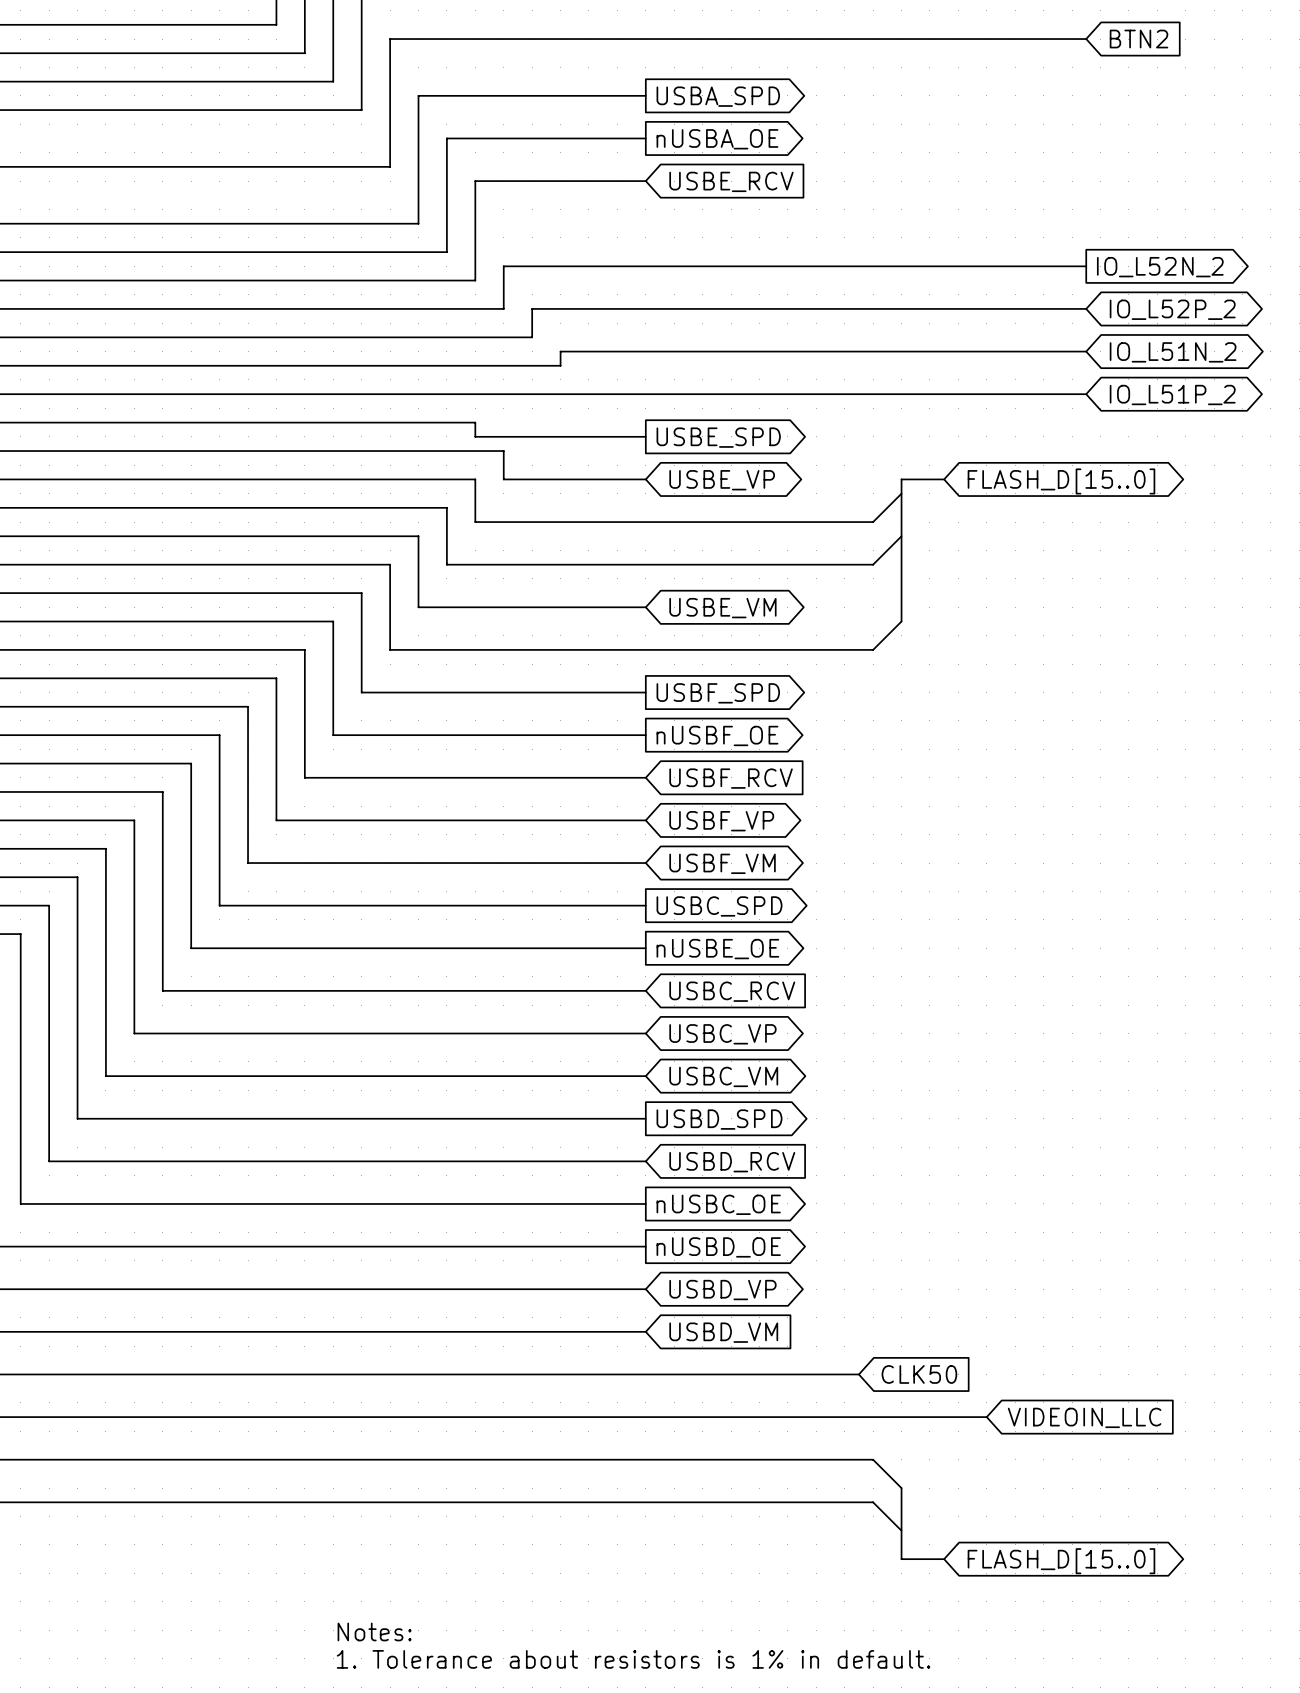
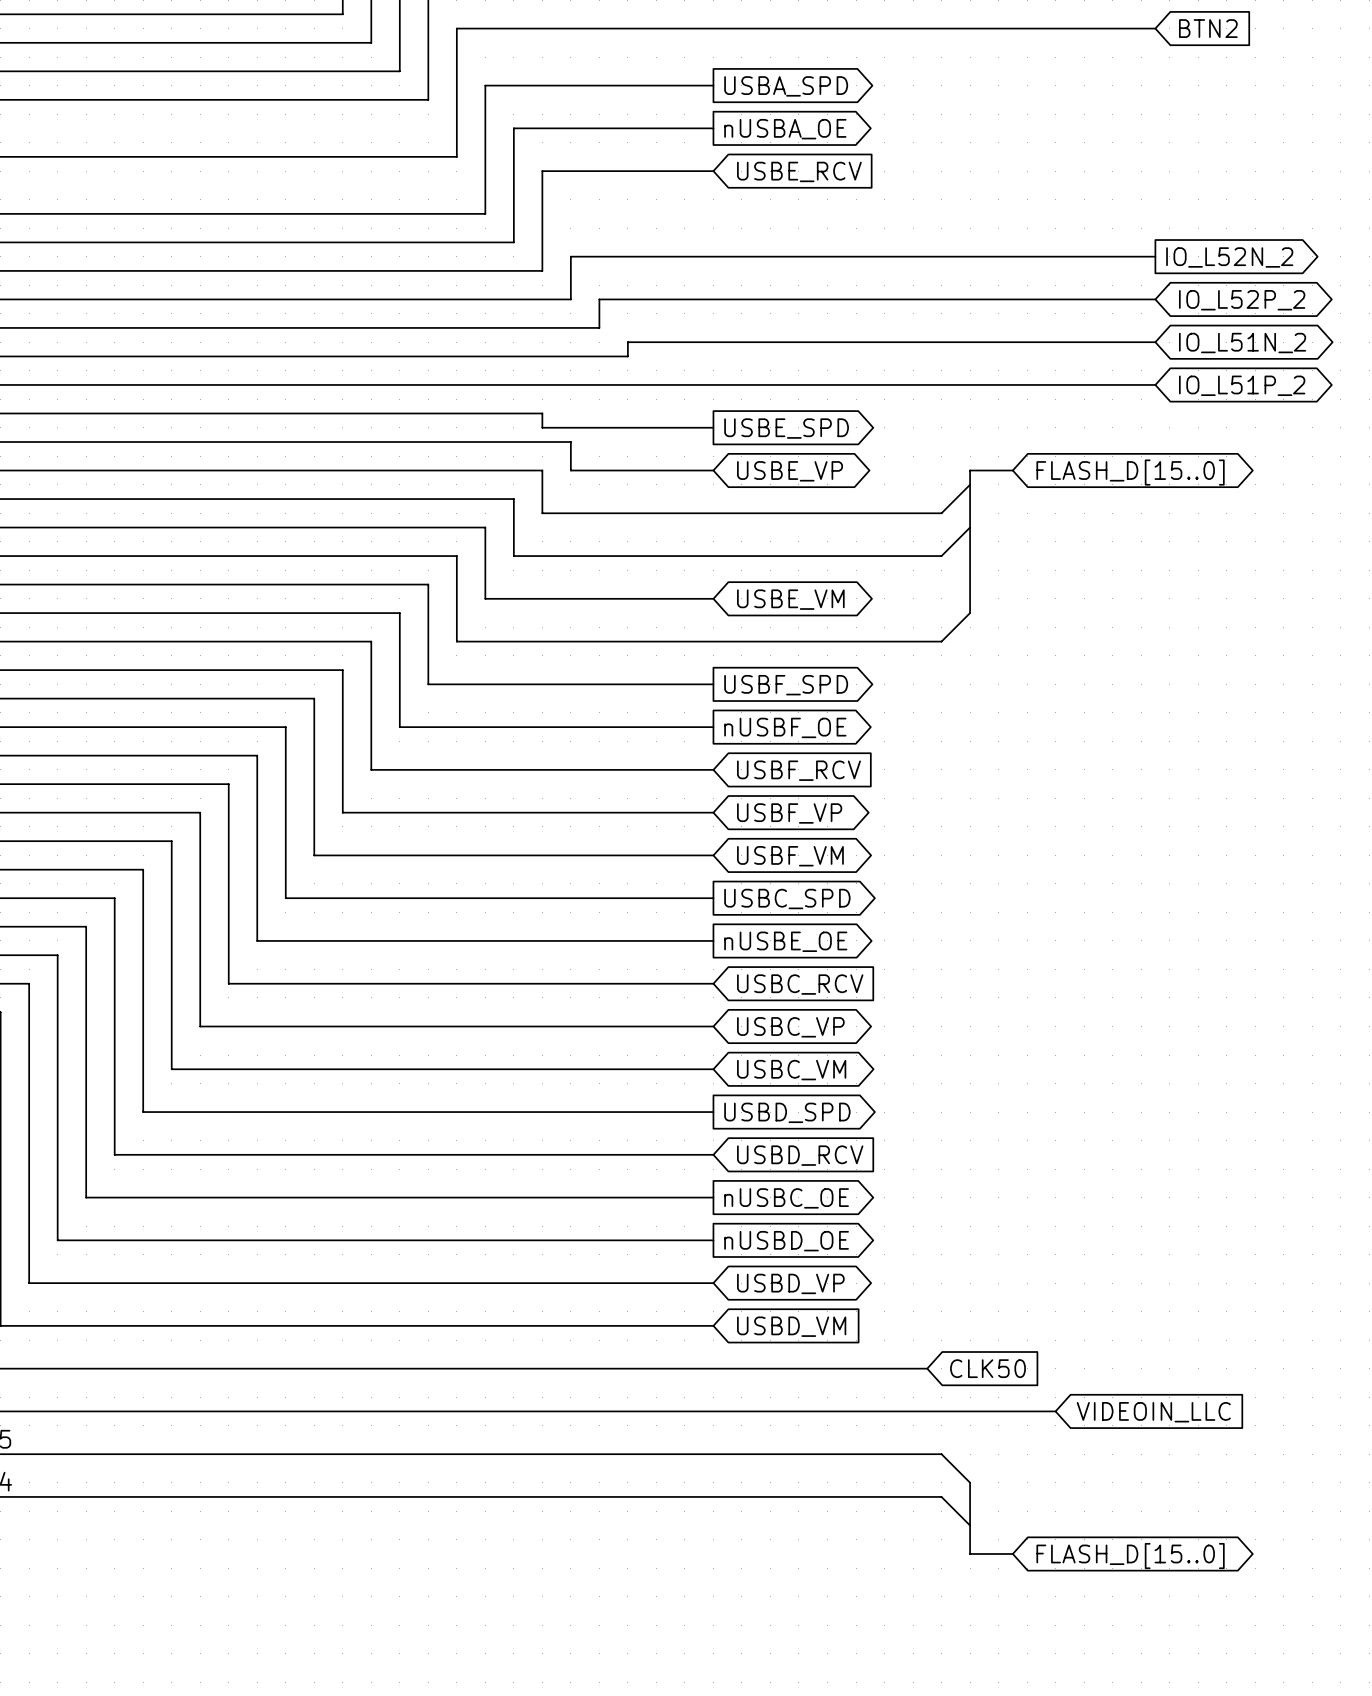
text: Notes: (374, 1631) -> none
text: 1. Tolerance about resistors is 1% in default. (633, 1659) -> none

